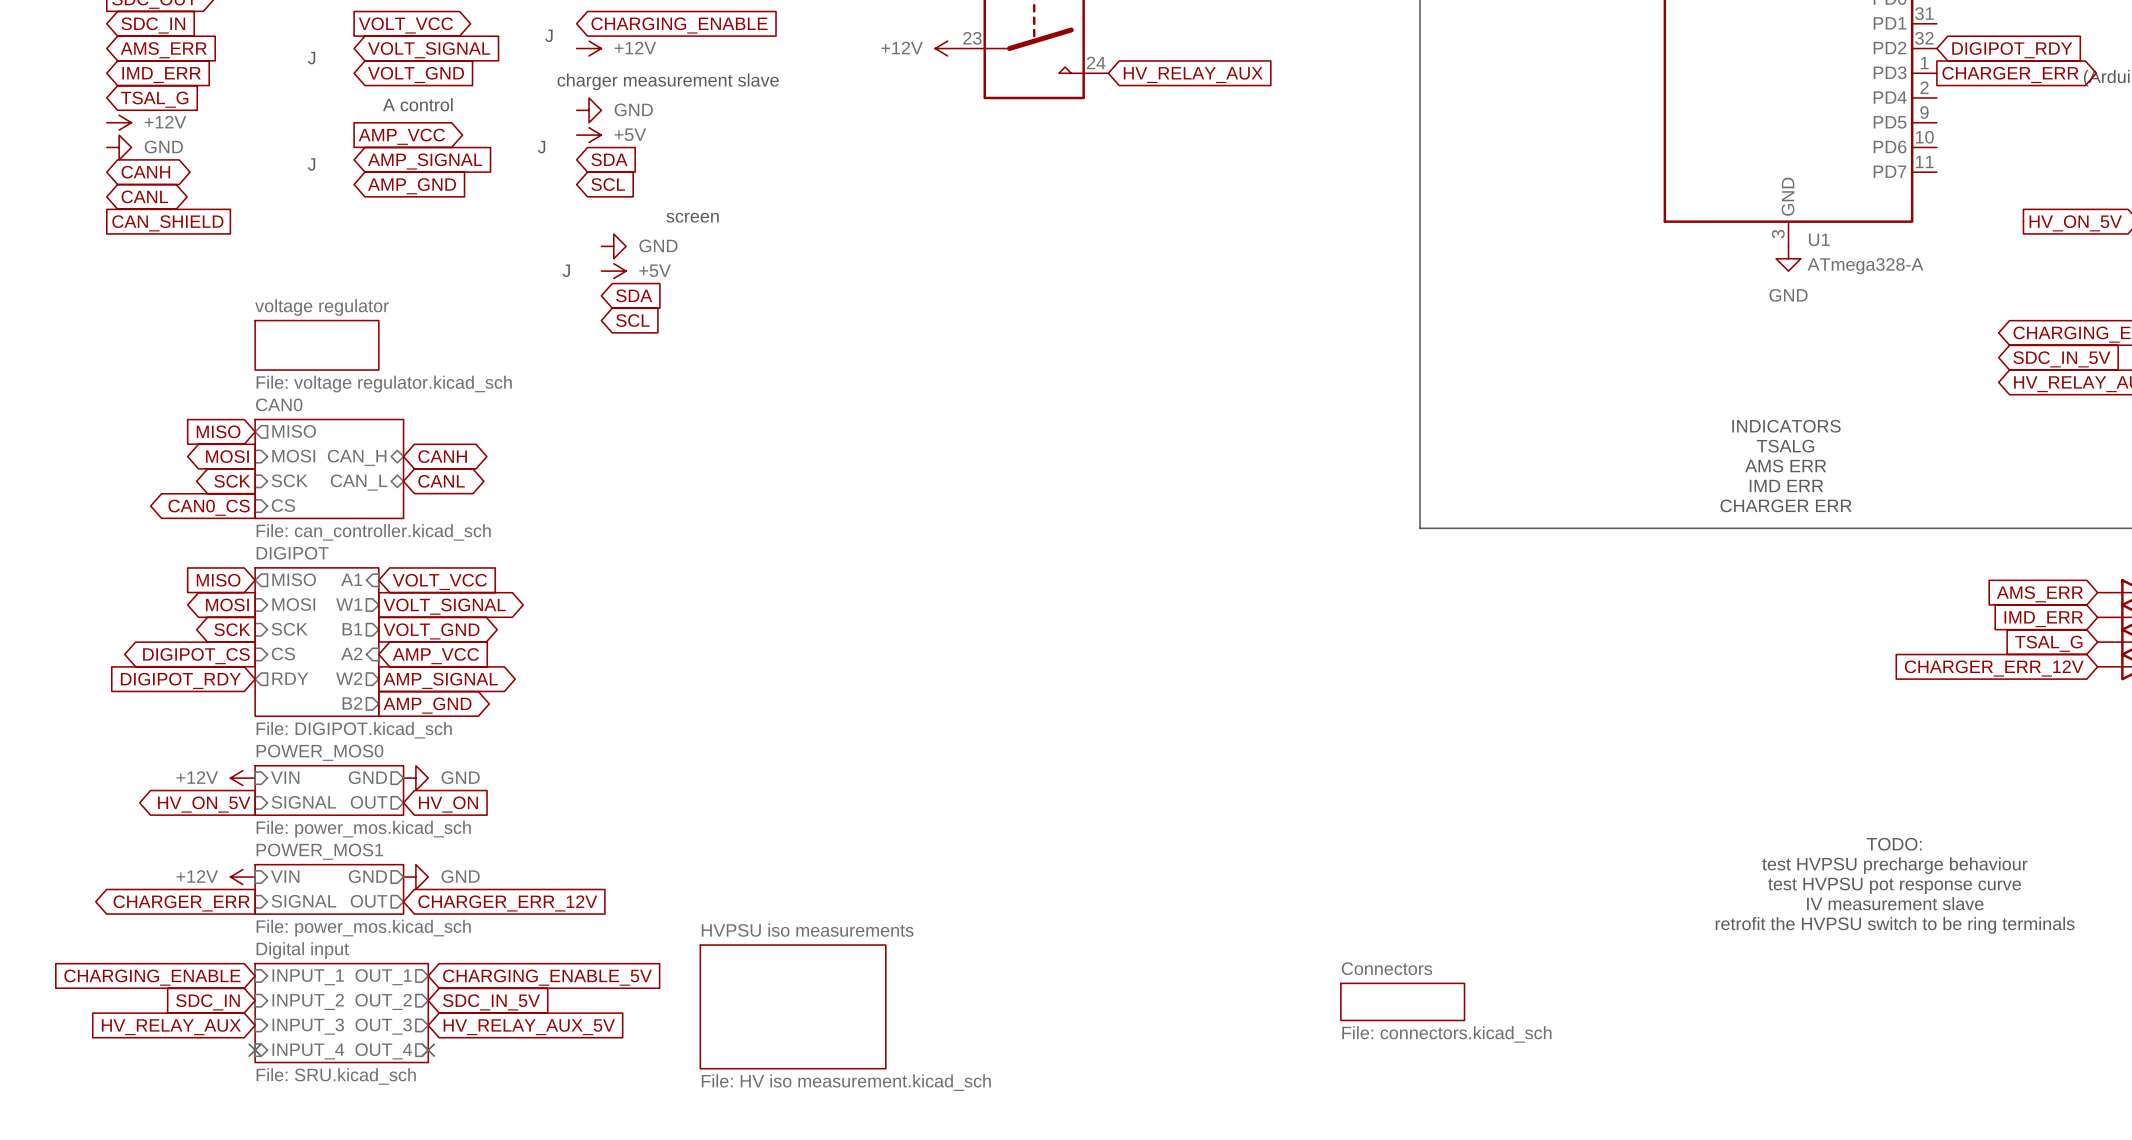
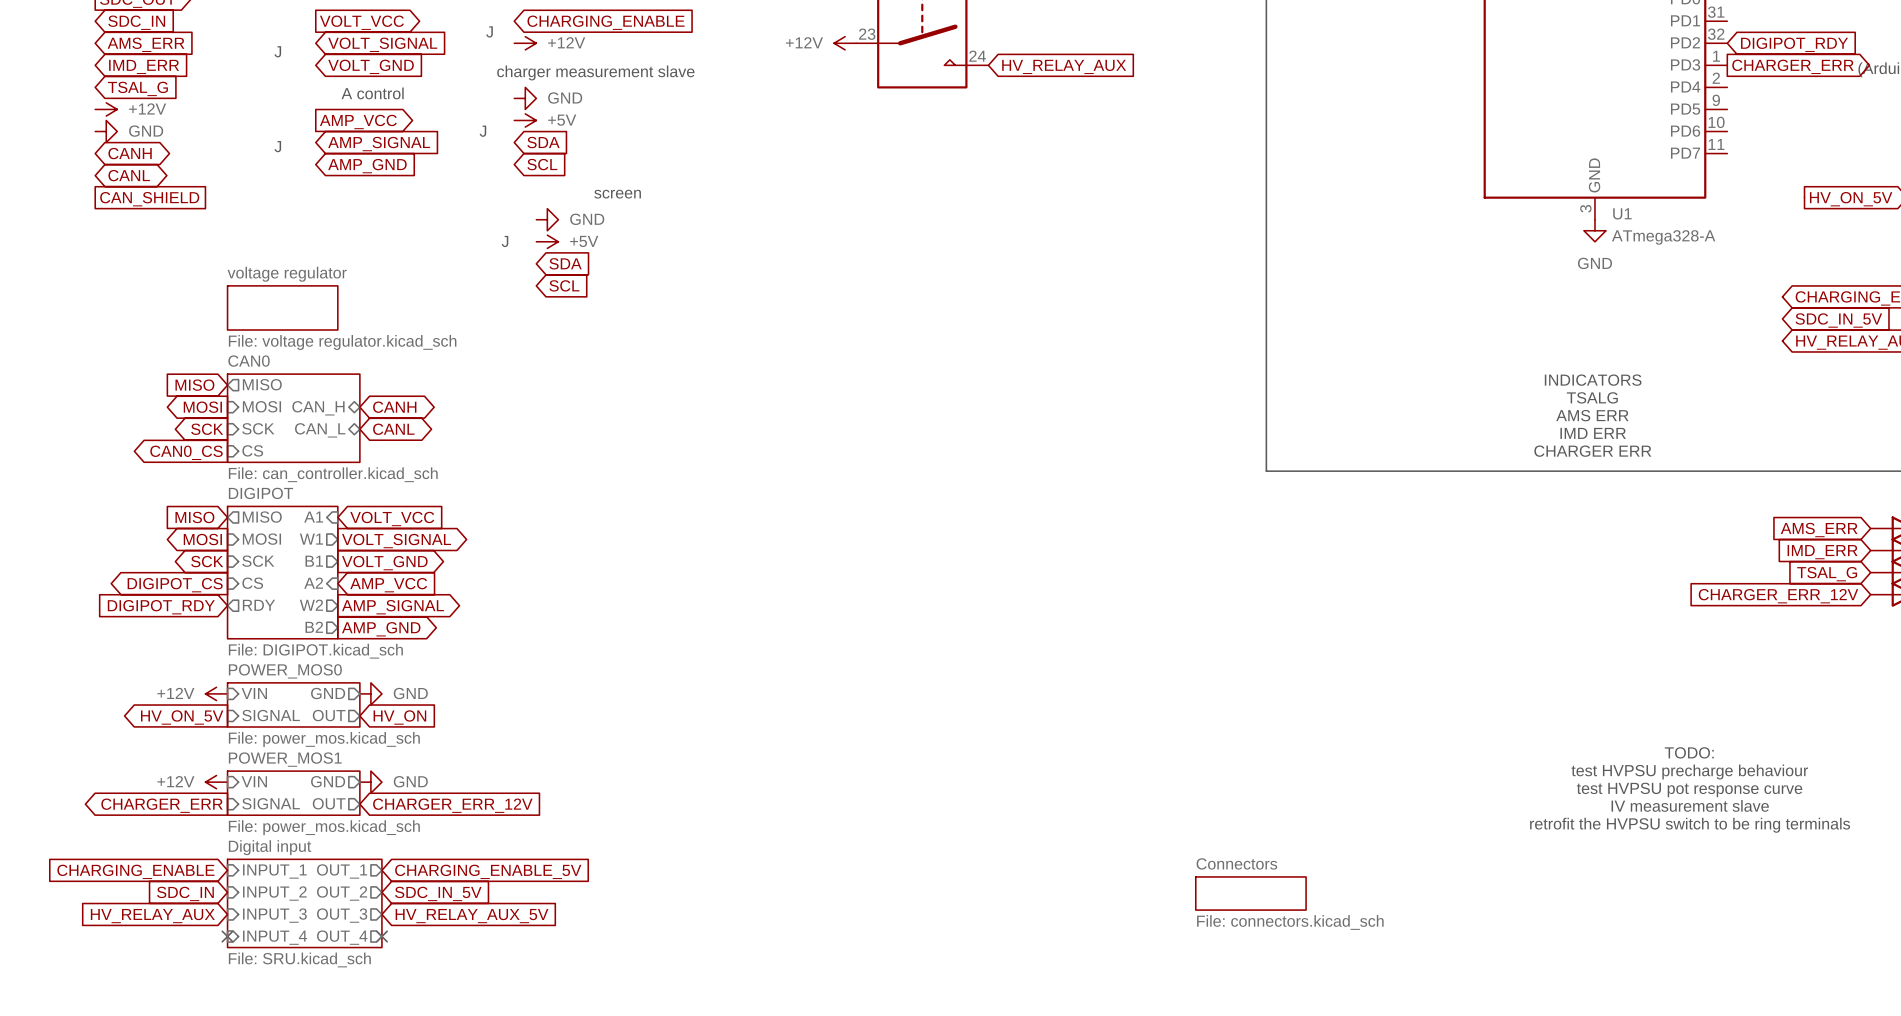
sheet HVPSU iso measurements: File: HV iso measurement.kicad_sch (793, 1006) -> none

